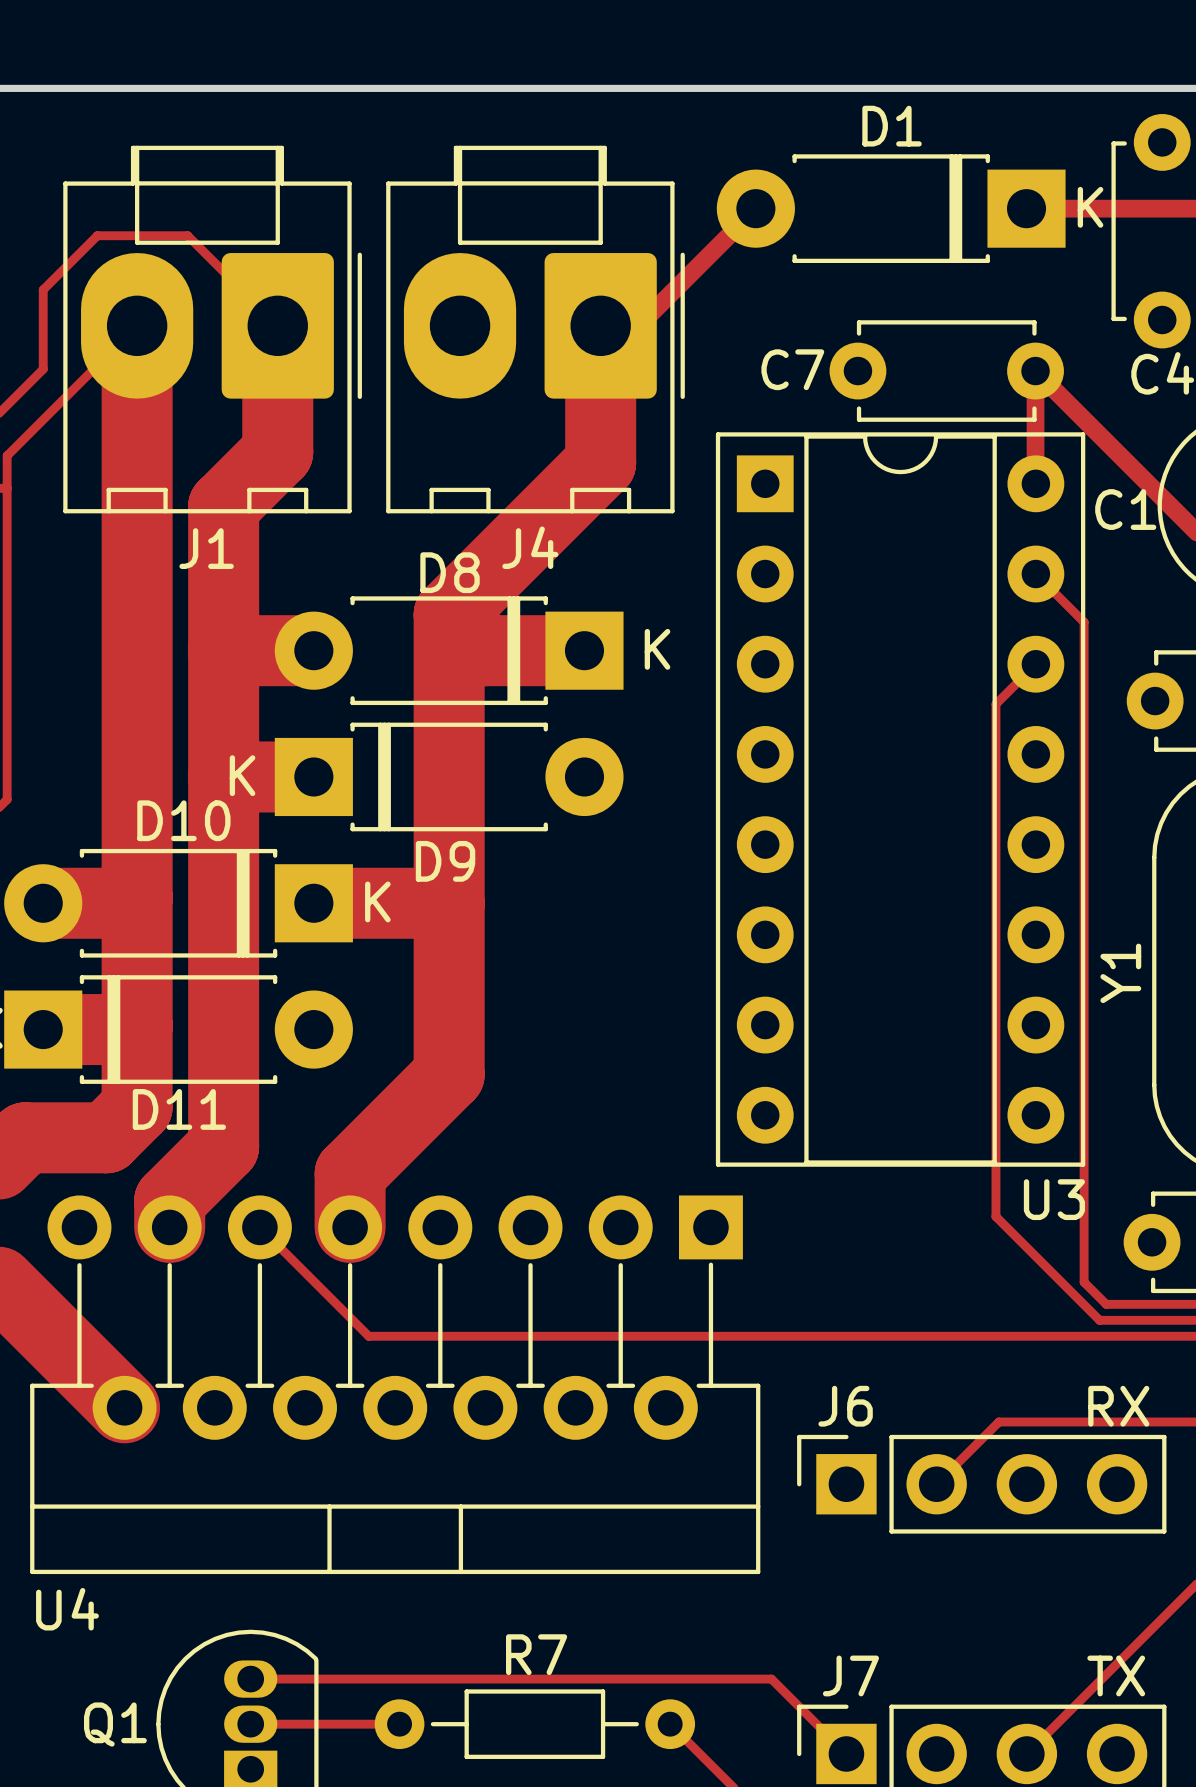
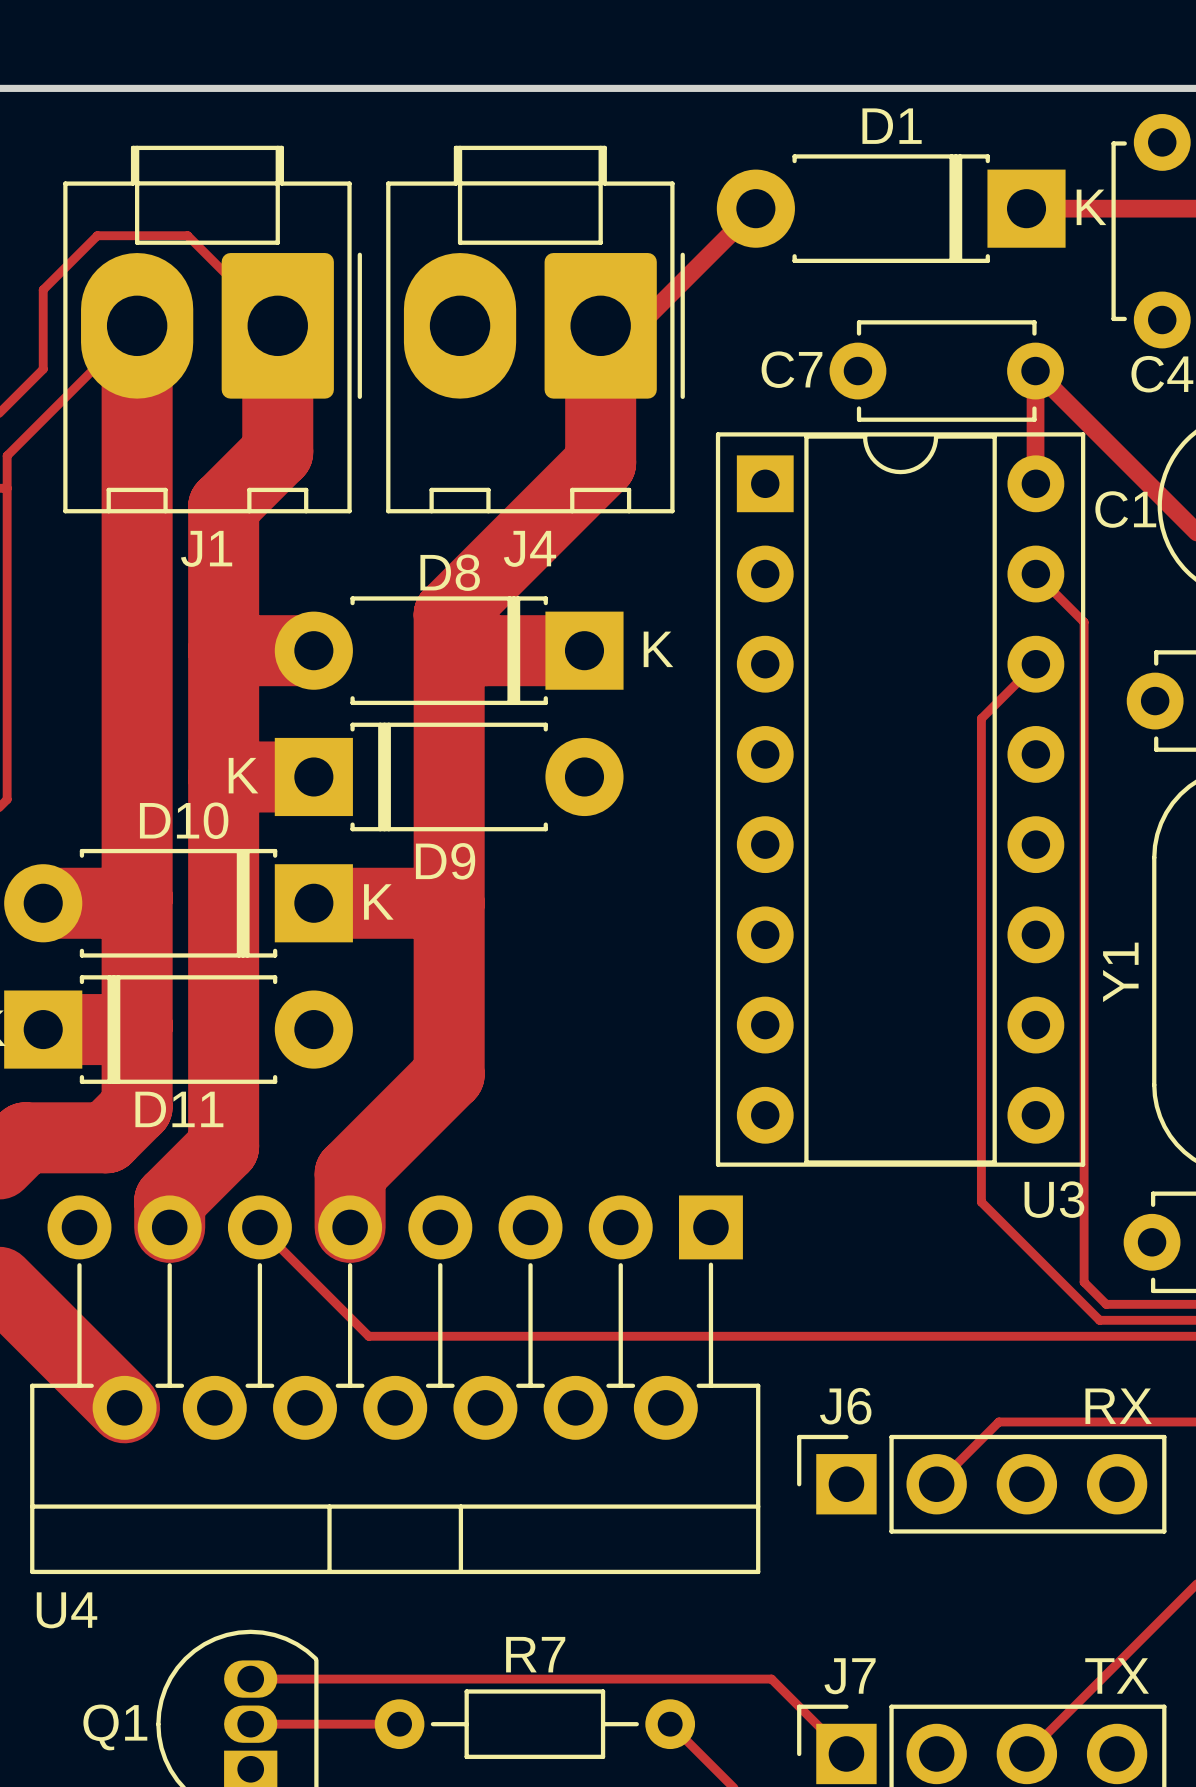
track: (995, 704) (995, 1216) -> (995, 704) (981, 718) (981, 1202) (995, 1216)

